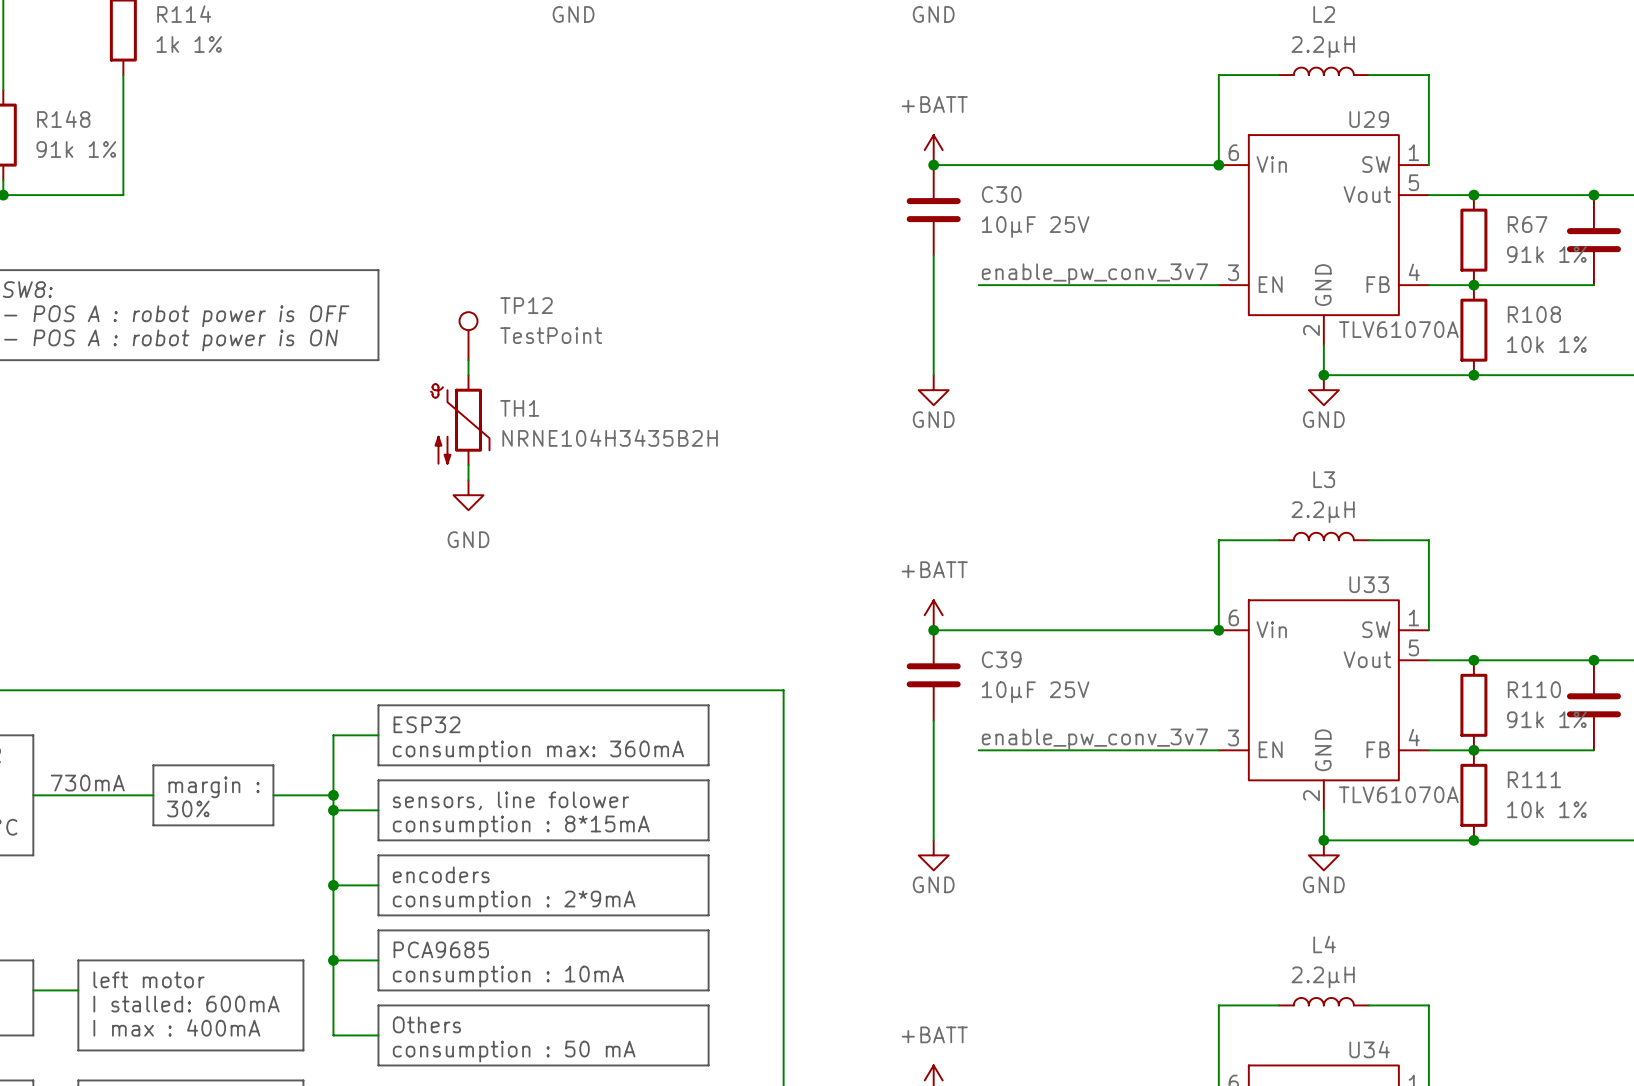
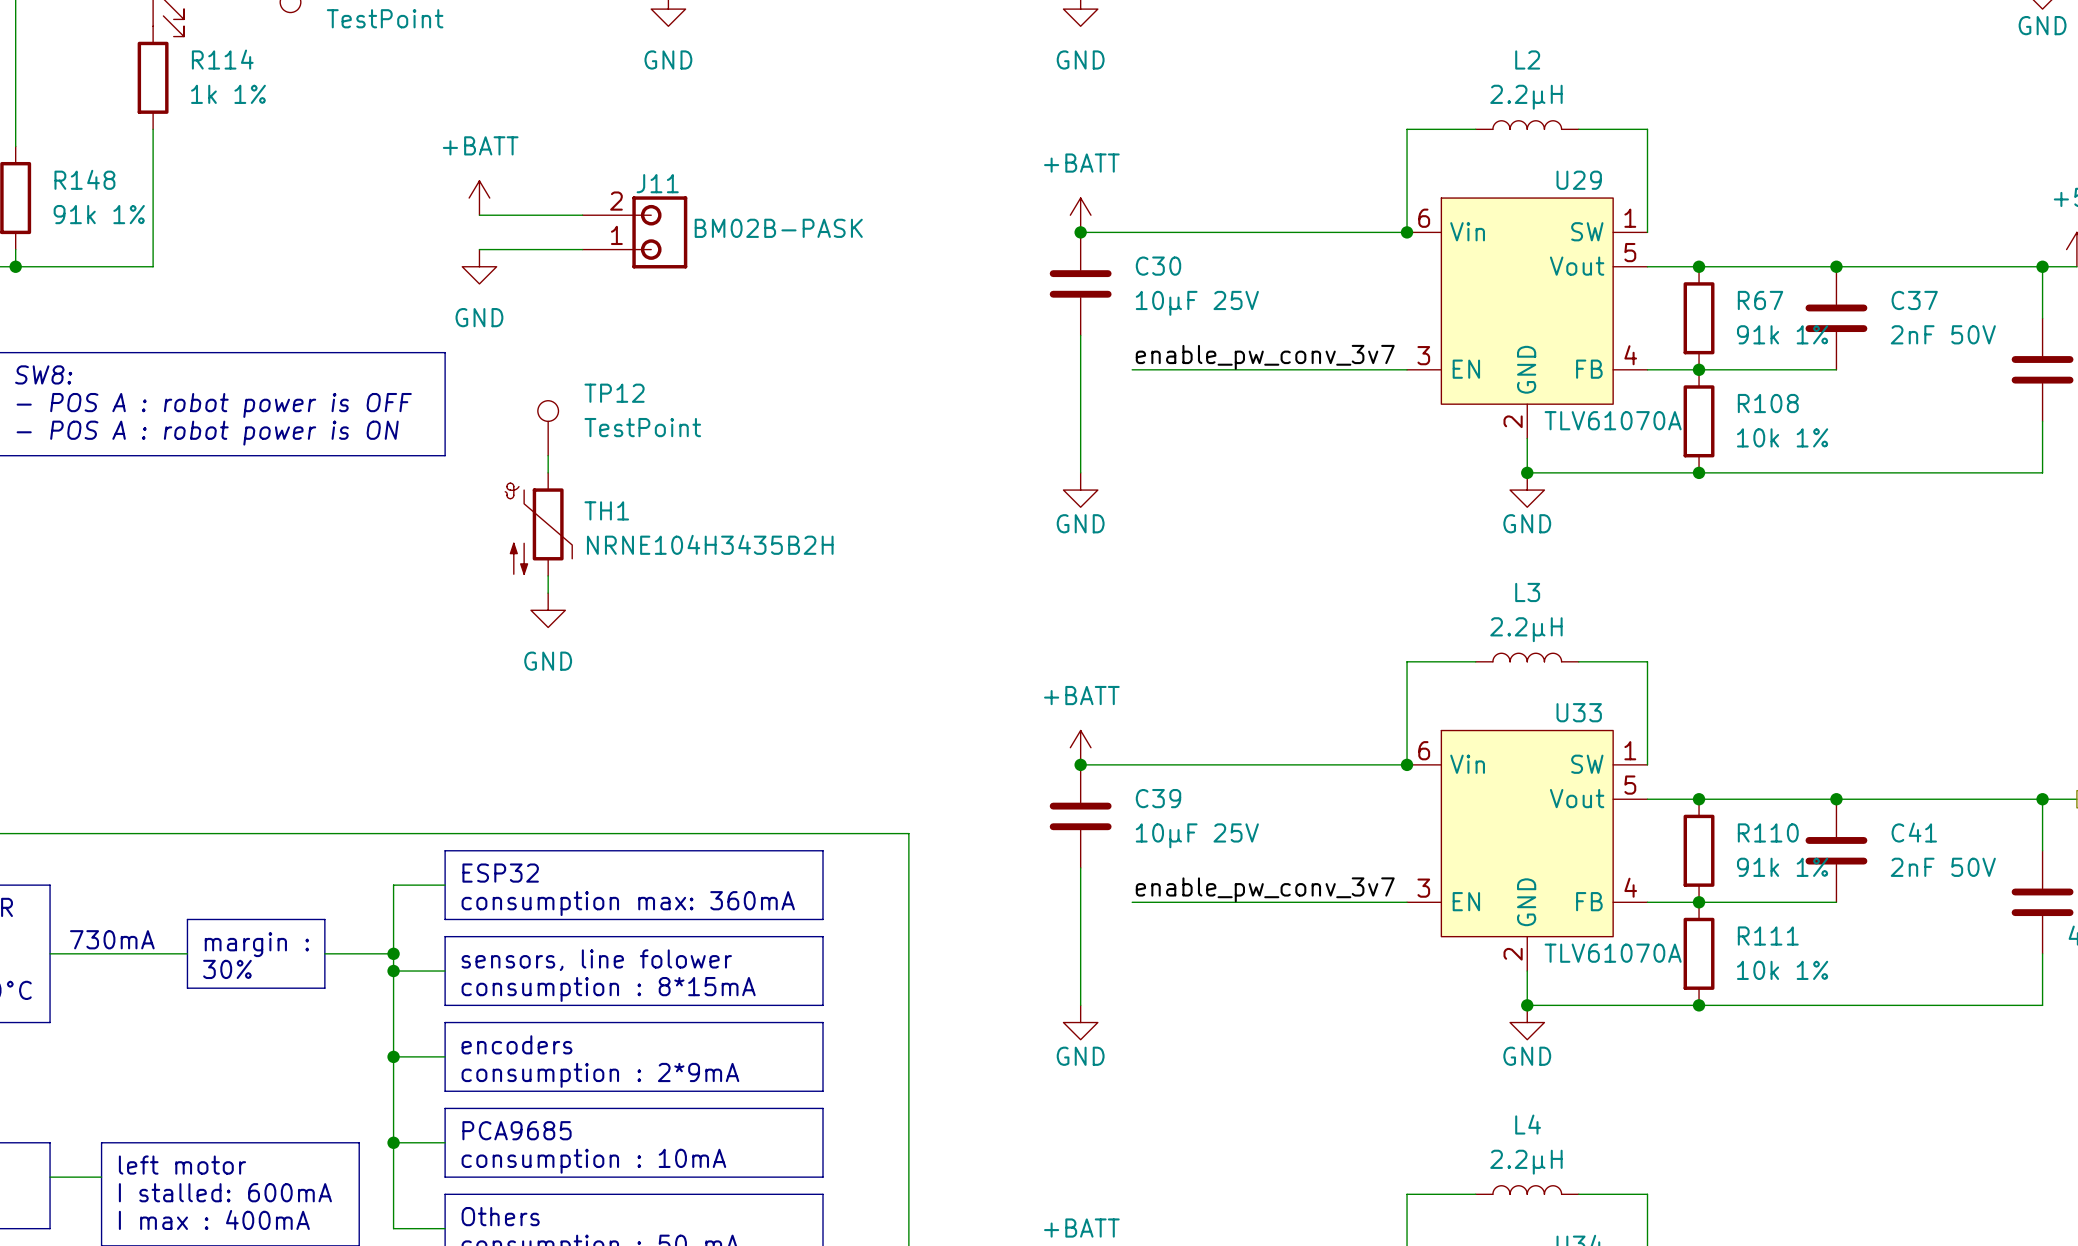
power symbol: none -> +BATT (479, 198)
wire: none -> (479, 215) (582, 215)
J11: none -> BM02B-PASK (634, 232)
wire: none -> (479, 249) (582, 249)
power symbol: none -> GND (479, 266)

